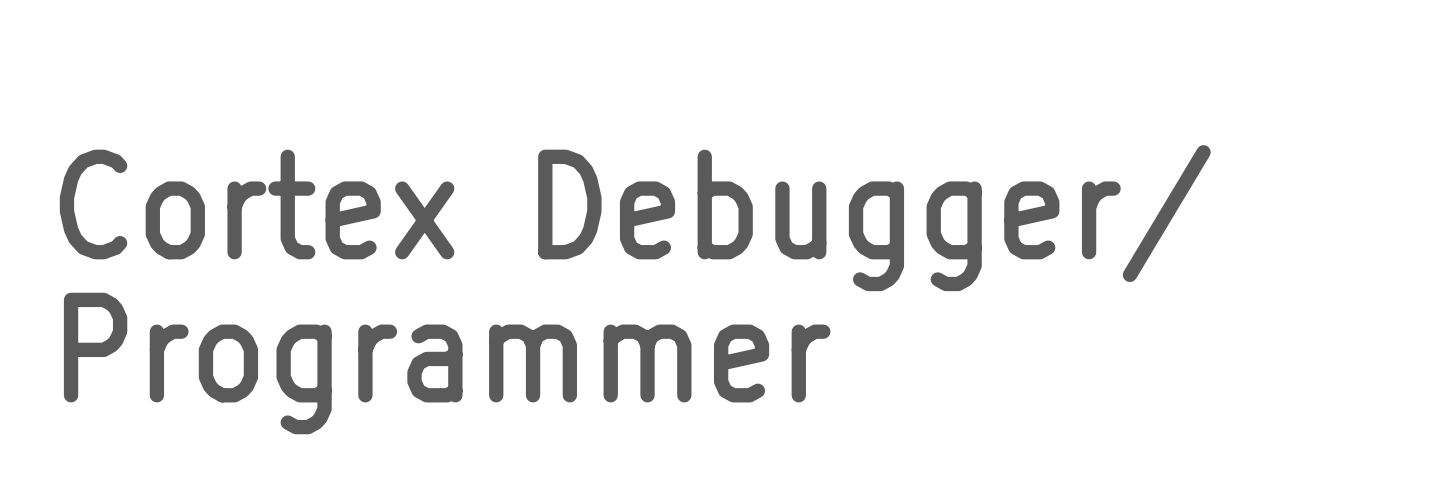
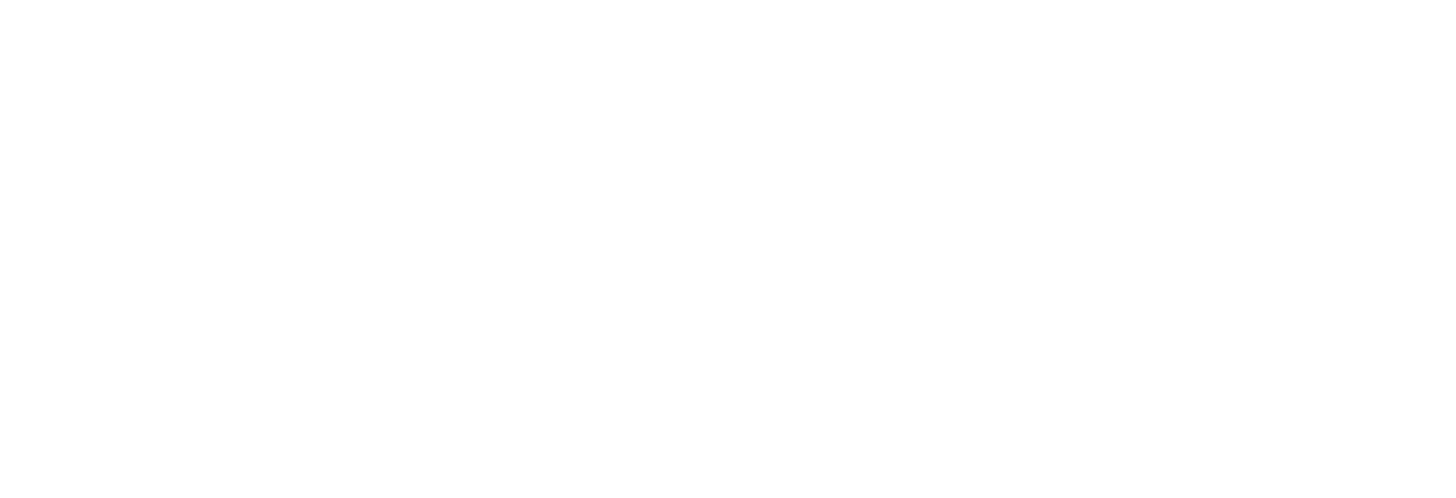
text: Cortex Debugger/ (635, 218) -> none
text: Programmer (447, 363) -> none

